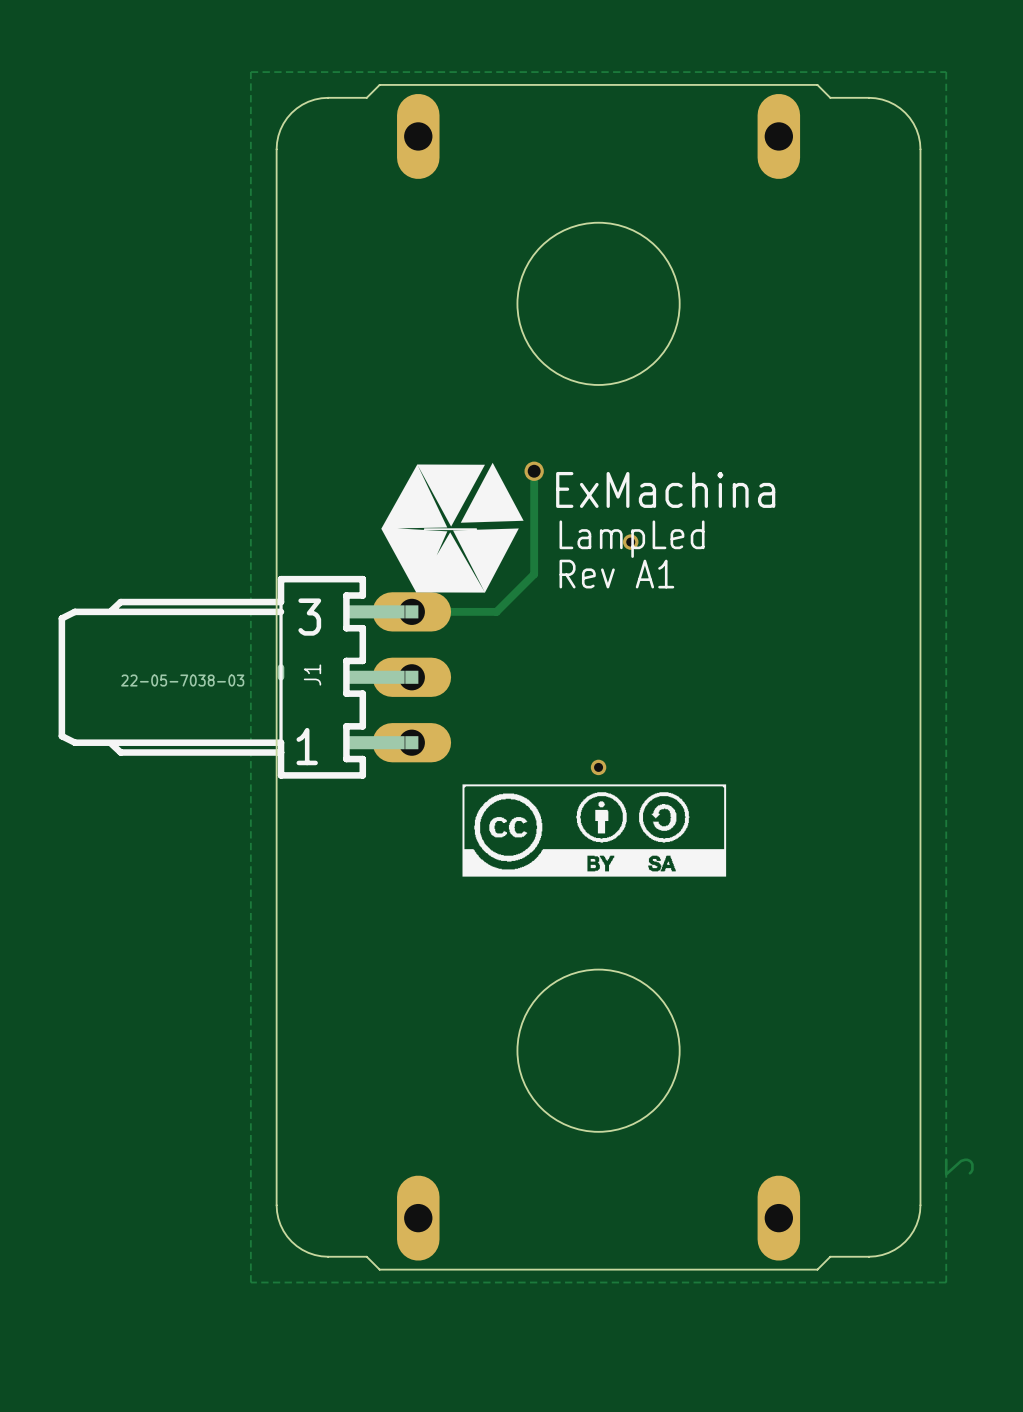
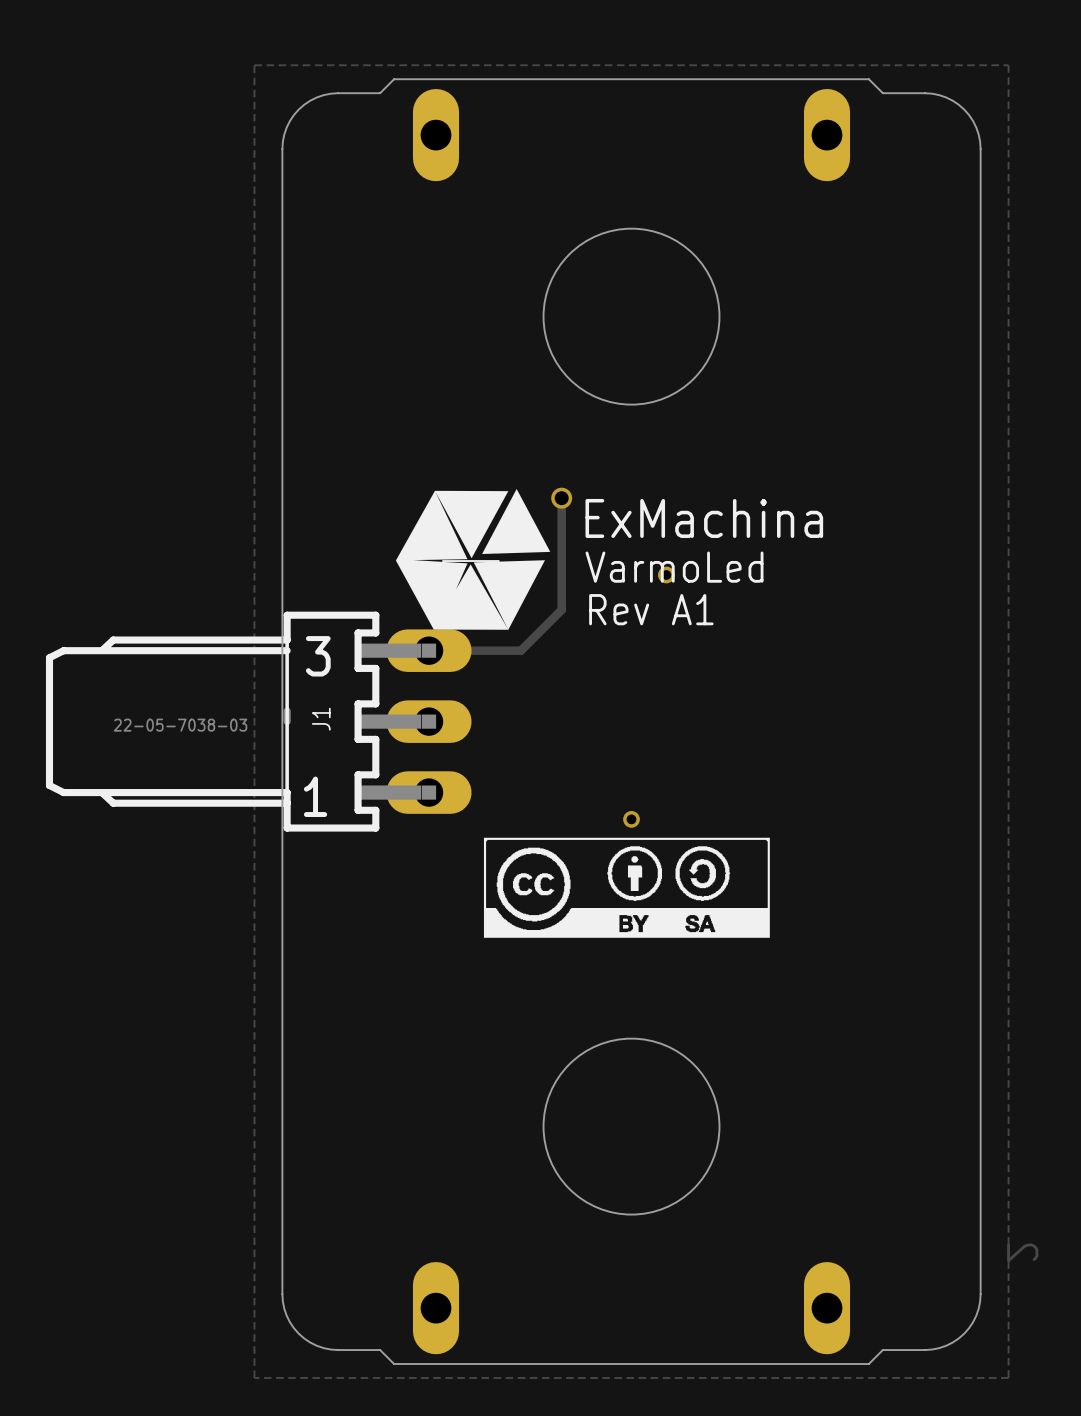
text: LampLed (632, 539) -> VarmoLed (674, 567)

